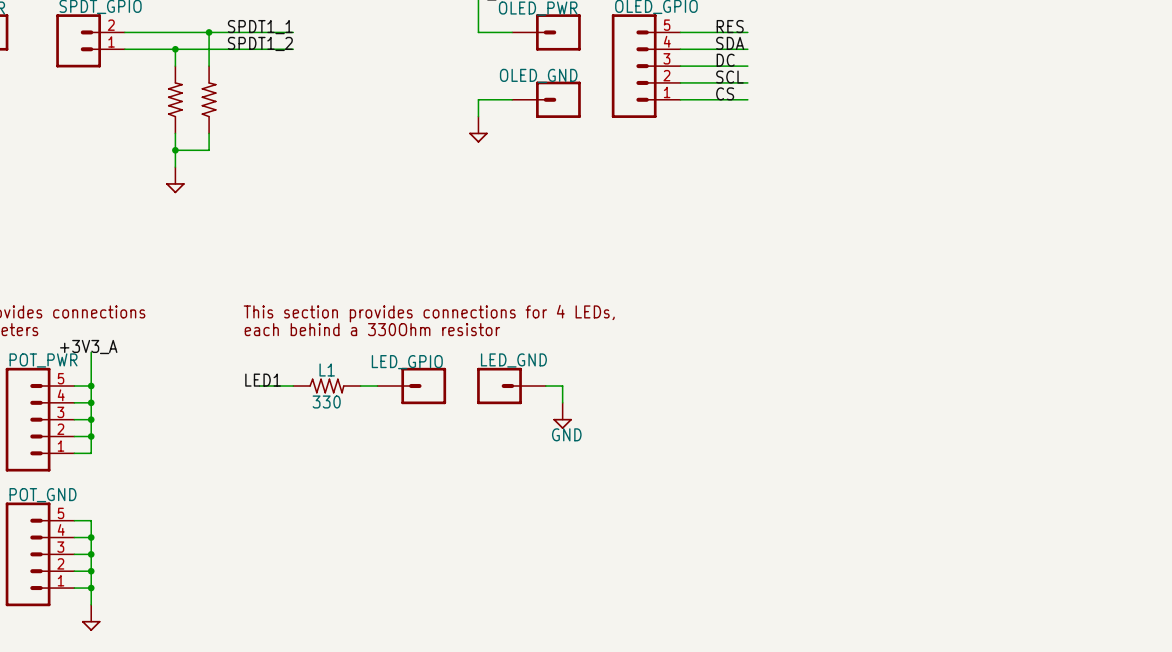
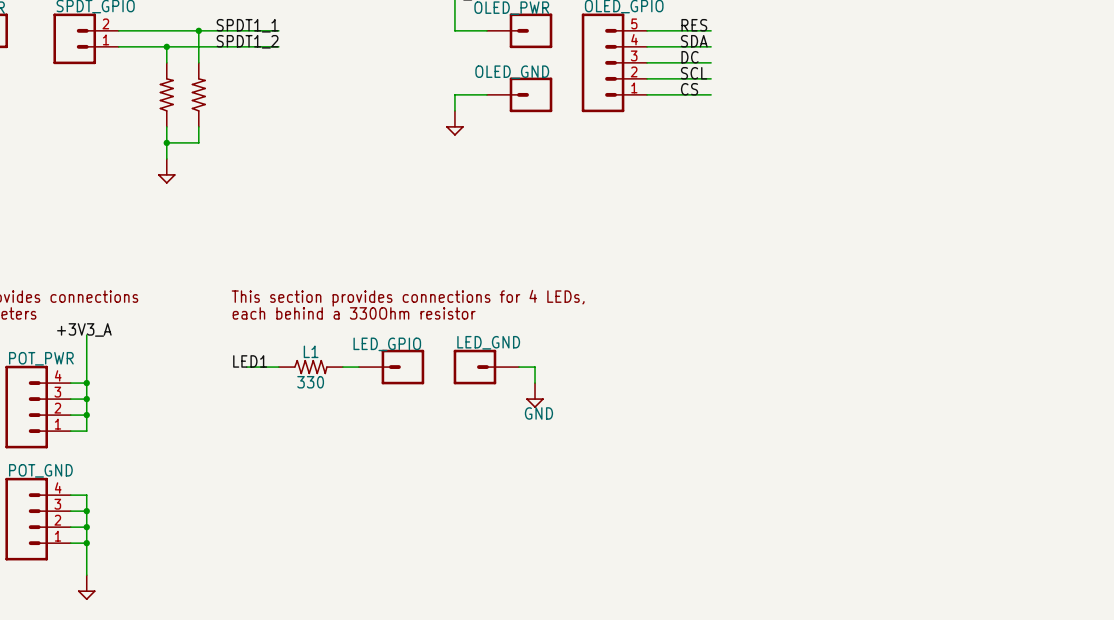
wire: (74, 386) (91, 386) -> none
junction: (91, 386) -> none
POT_PWR: (40, 419) -> none
POT_PWR: none -> (38, 407)
POT_GND: none -> (38, 519)
POT_GND: (40, 554) -> none
wire: (74, 588) (91, 588) -> none
junction: (91, 588) -> none

